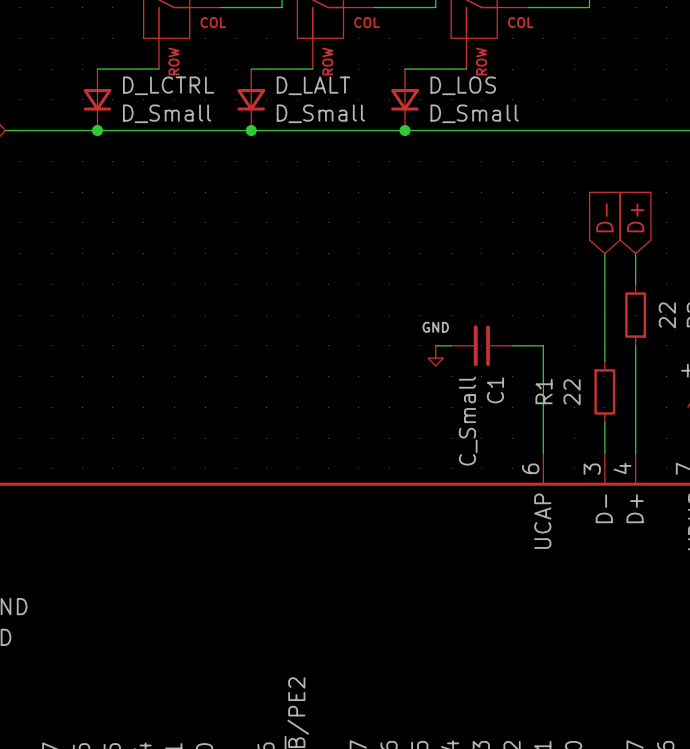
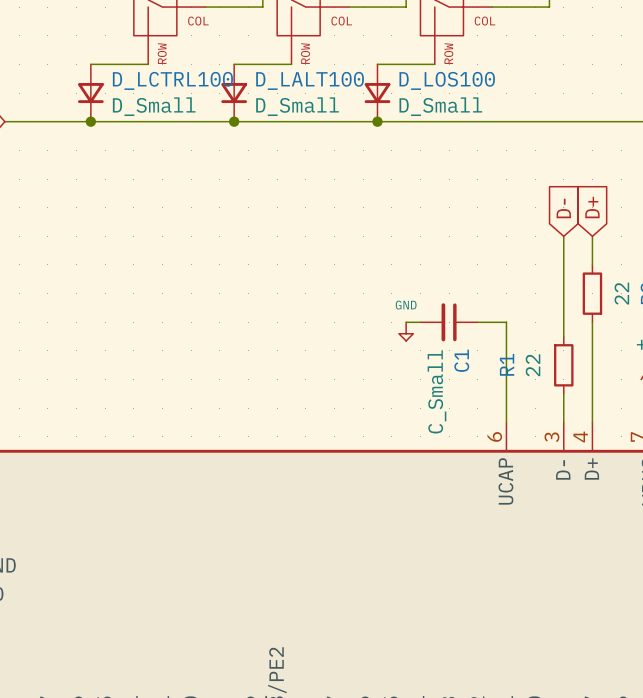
D_LCTRL name: D_LCTRL (168, 85) -> D_LCTRL100 (172, 80)
D_LALT name: D_LALT (313, 85) -> D_LALT100 (310, 80)
D_LOS name: D_LOS (463, 85) -> D_LOS100 (447, 80)

